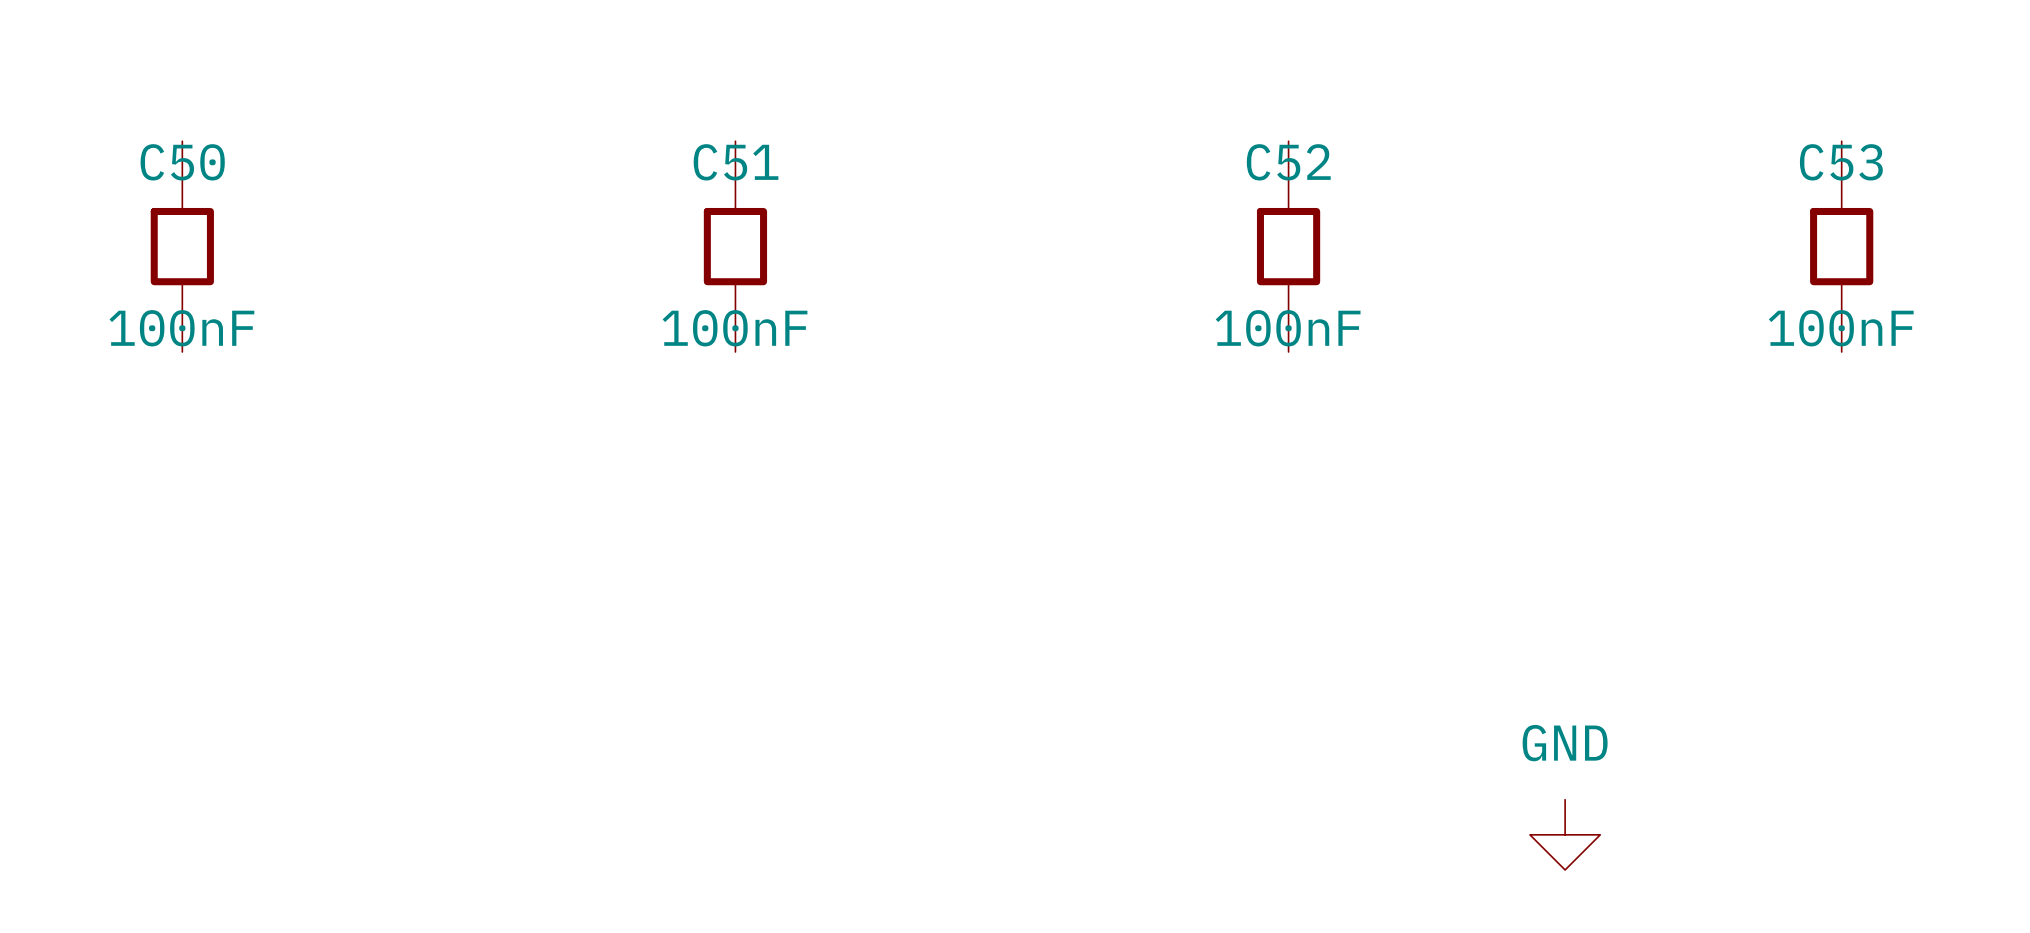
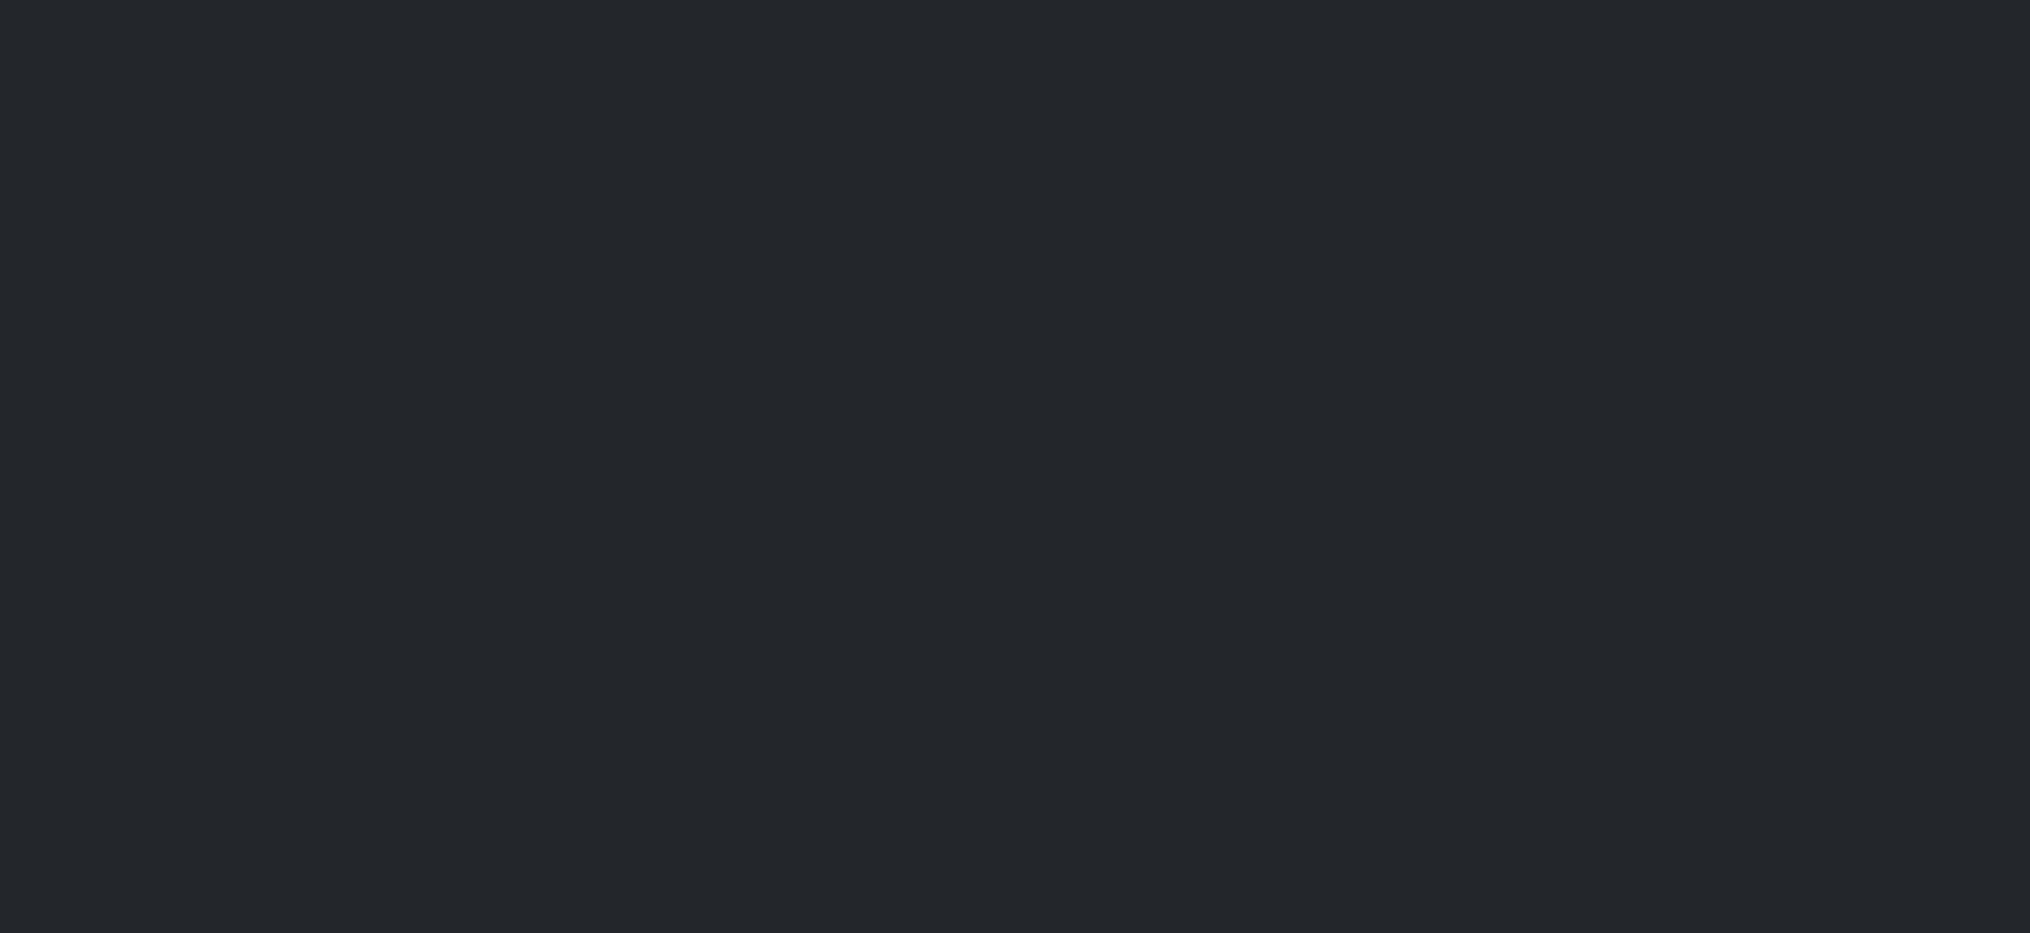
C50: 100nF (182, 246) -> none
C51: 100nF (735, 246) -> none
C52: 100nF (1288, 246) -> none
C53: 100nF (1841, 246) -> none
power symbol: GND (1565, 834) -> none

